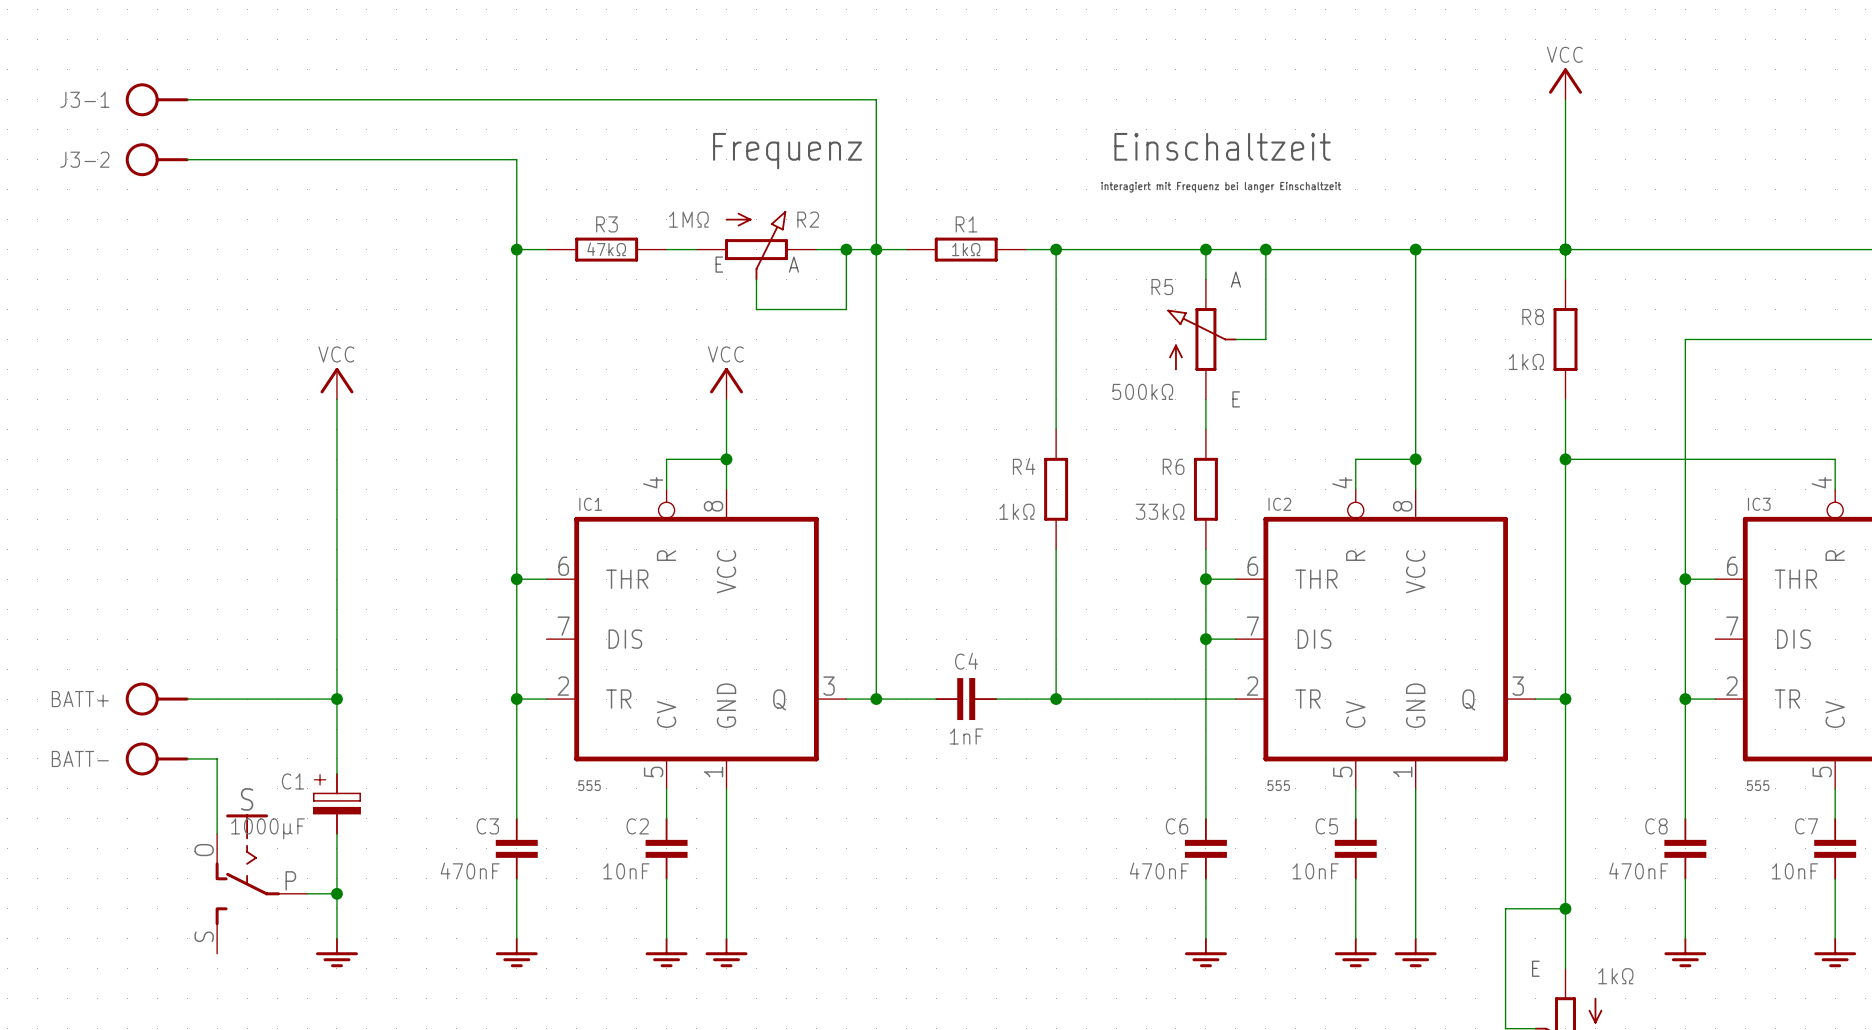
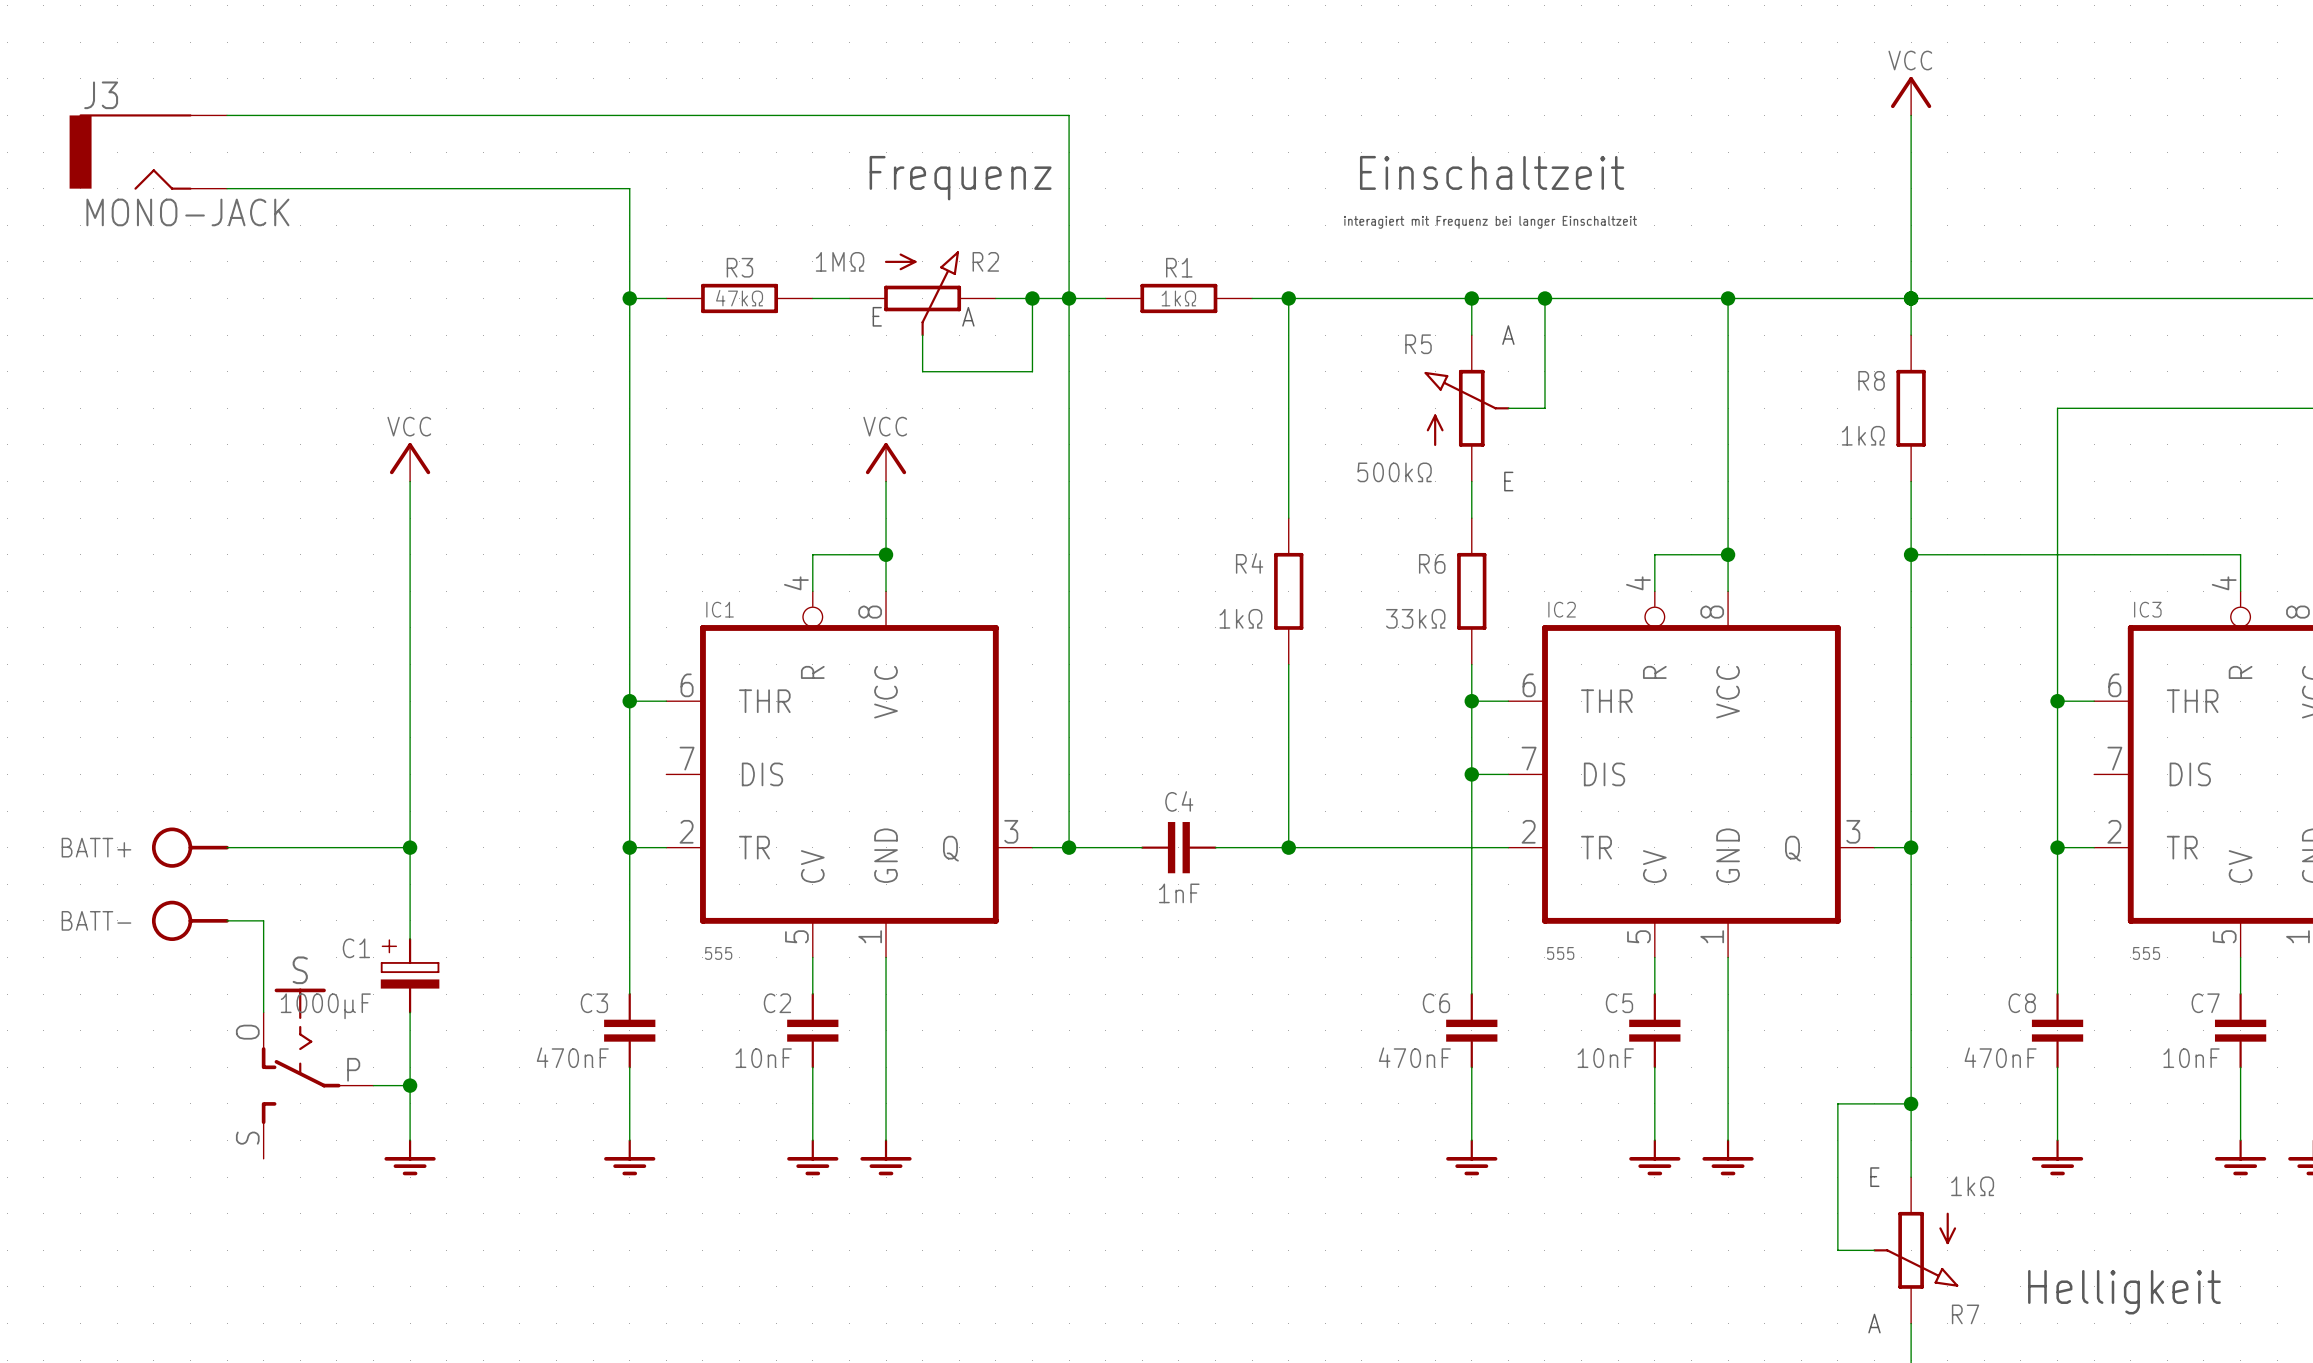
J3-1: (157, 99) -> none
J3: none -> MONO-JACK (148, 152)
J3-2: (157, 159) -> none

